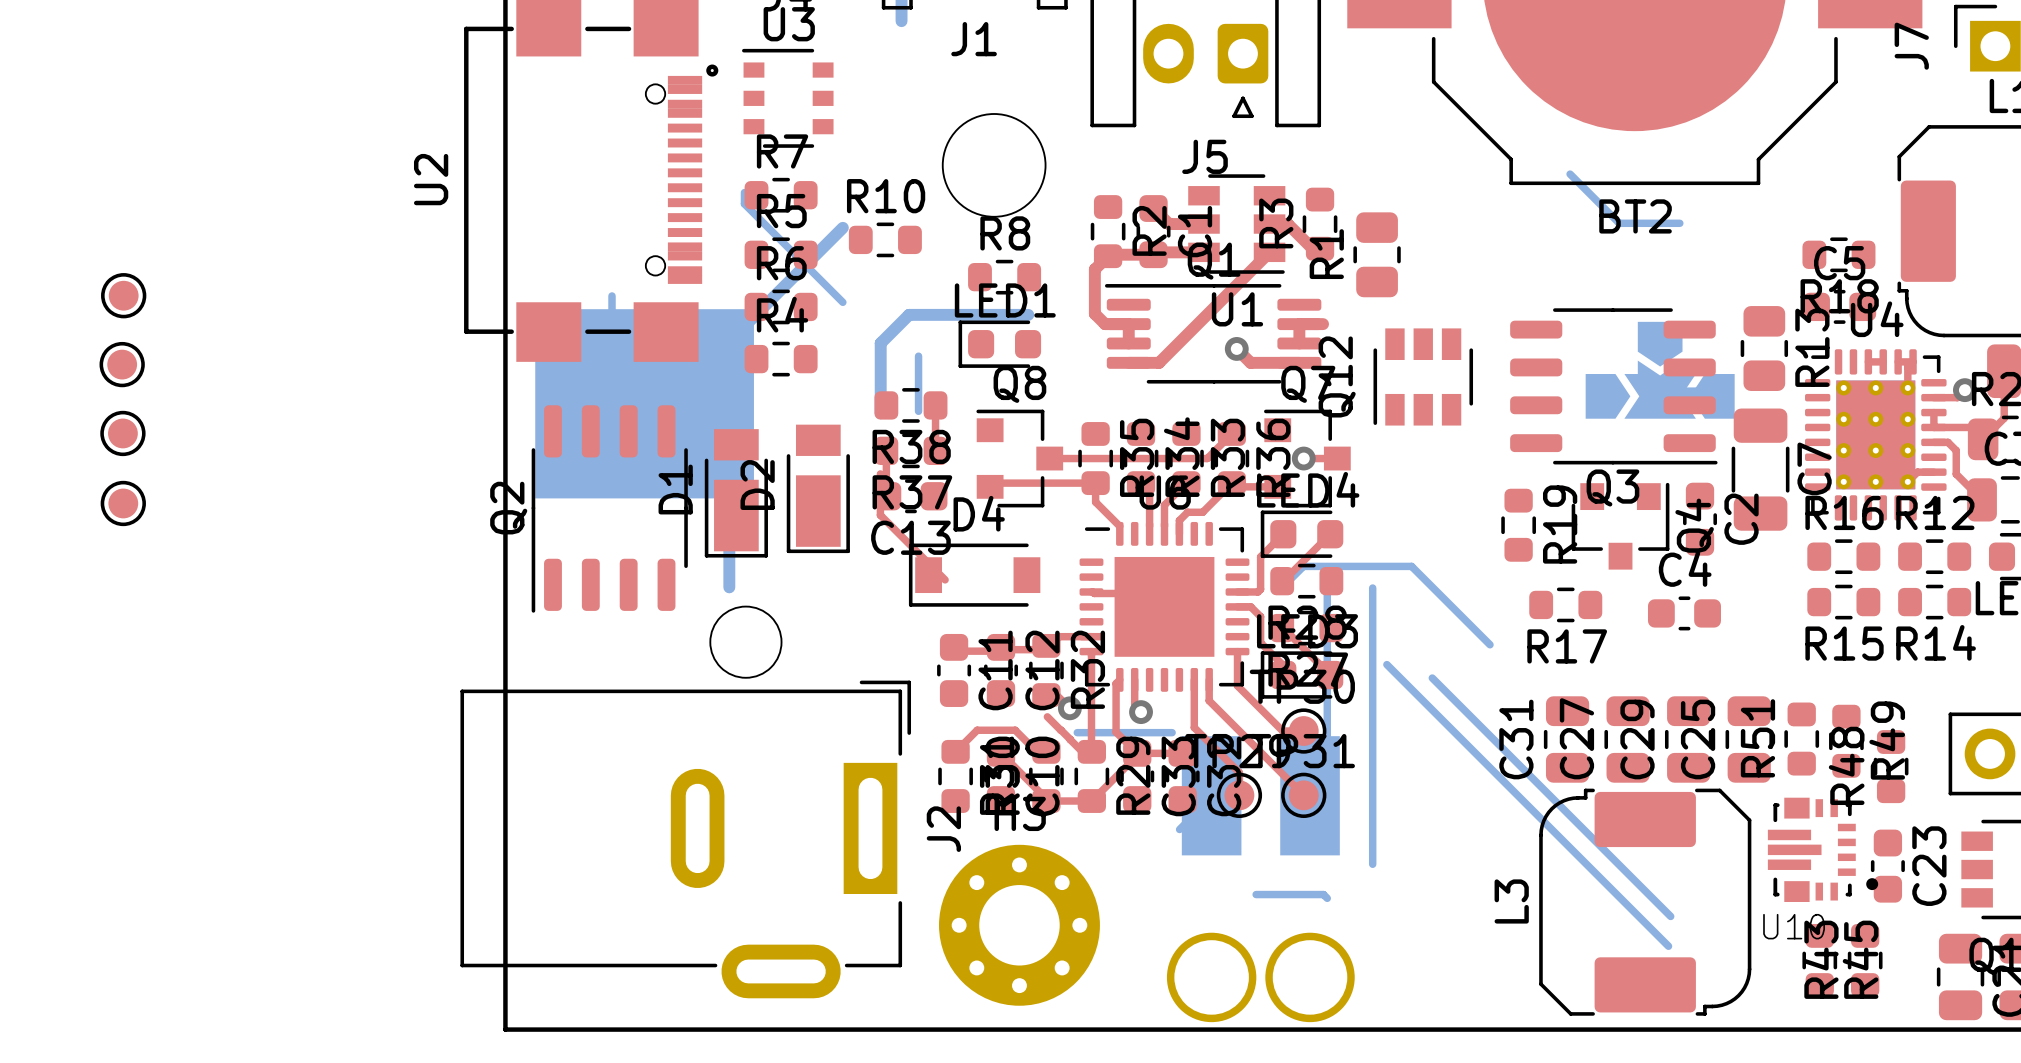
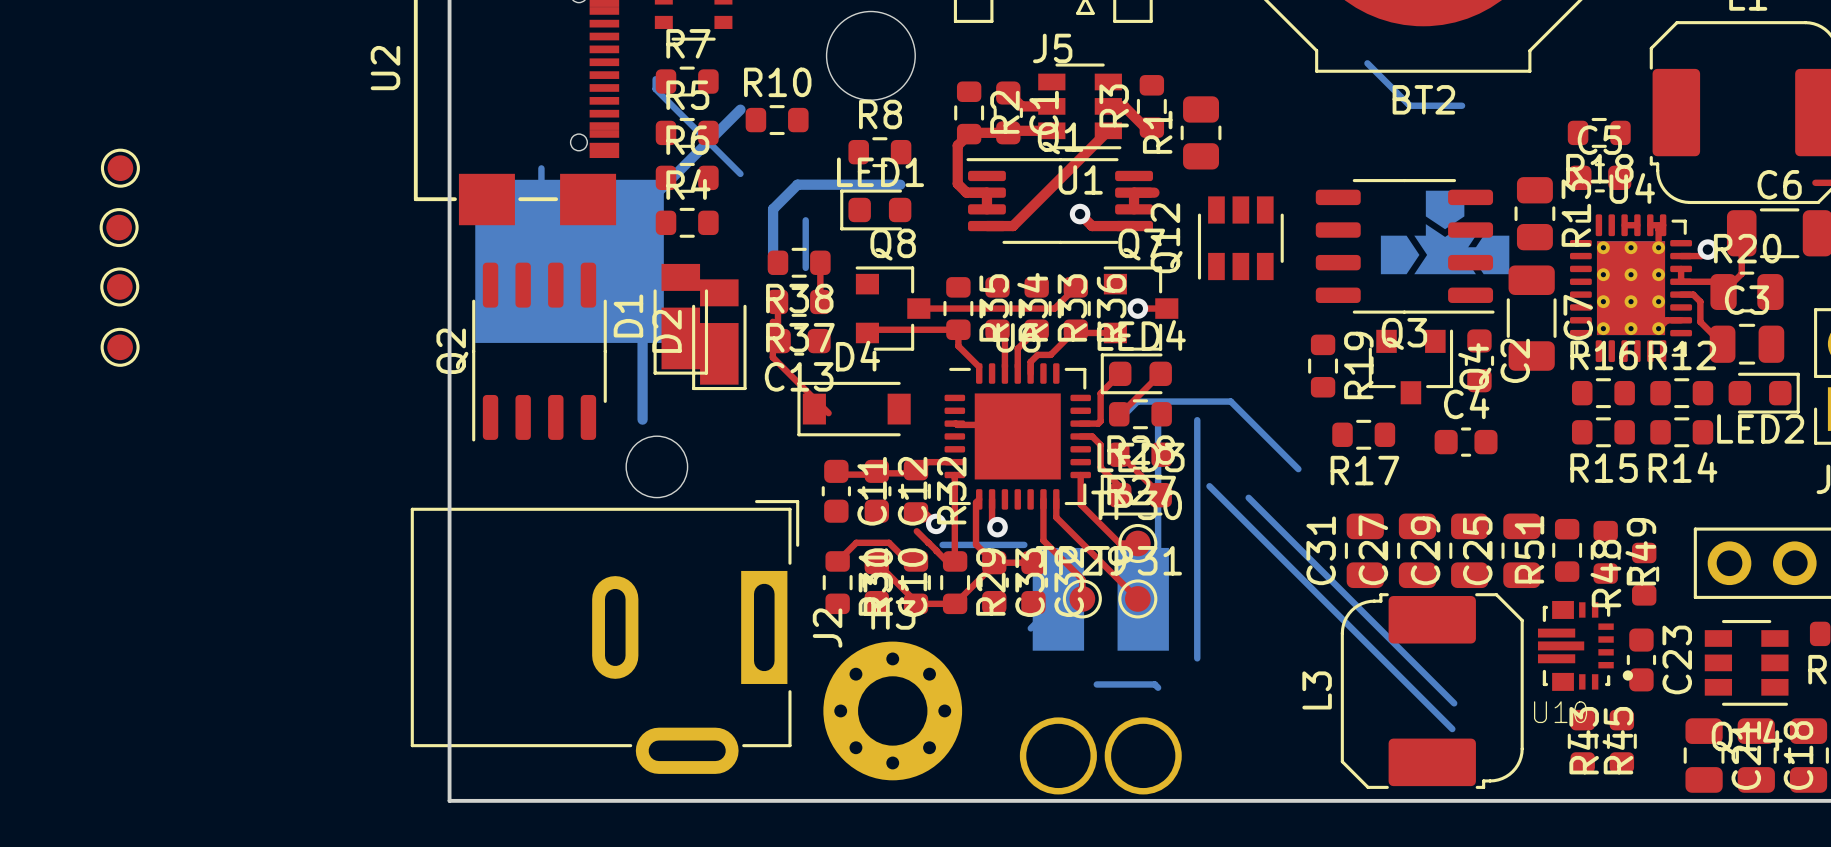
D1 position: (736, 493) -> (680, 319)

